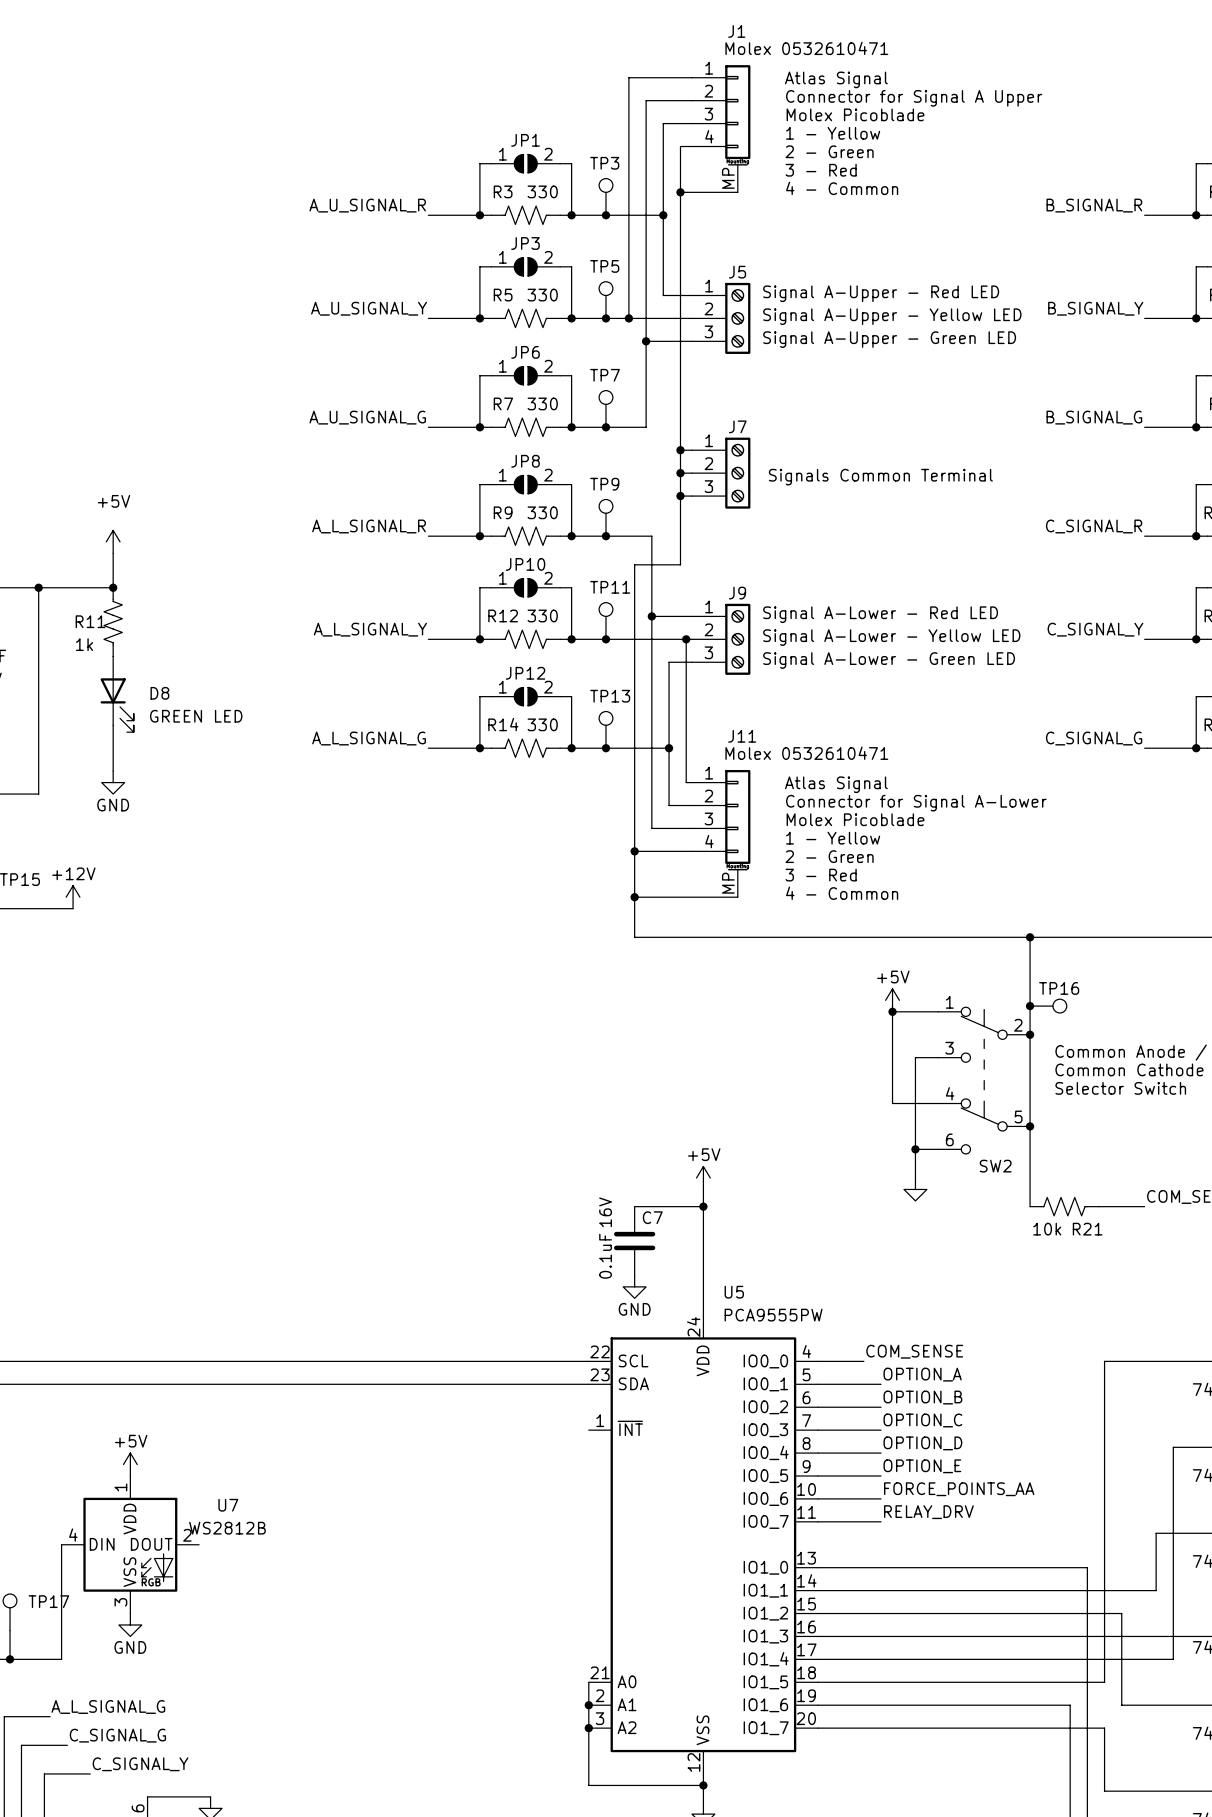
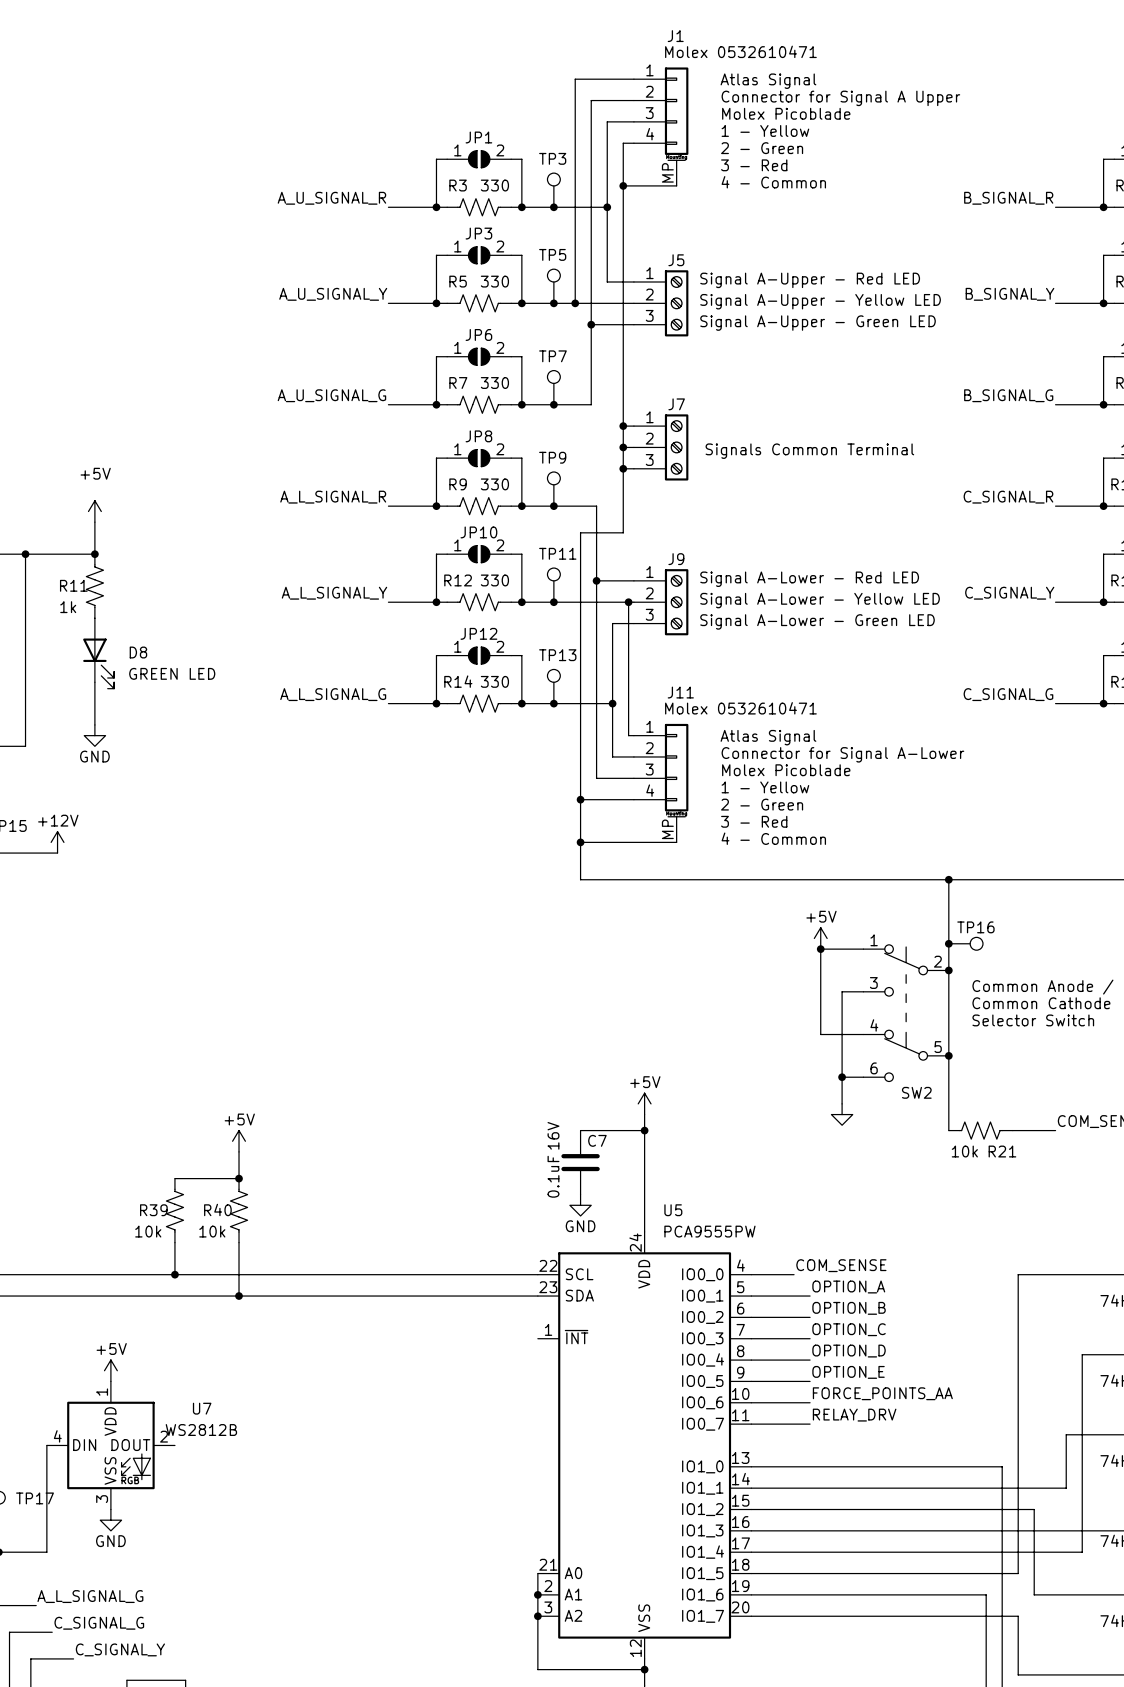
power symbol: none -> +5V (239, 1141)
wire: none -> (239, 1151) (239, 1178) (174, 1178)
junction: none -> (239, 1178)
R39: none -> 10k (174, 1210)
R40: none -> 10k (239, 1210)
wire: none -> (174, 1242) (174, 1274)
wire: none -> (239, 1242) (239, 1296)
junction: none -> (174, 1274)
junction: none -> (239, 1296)

